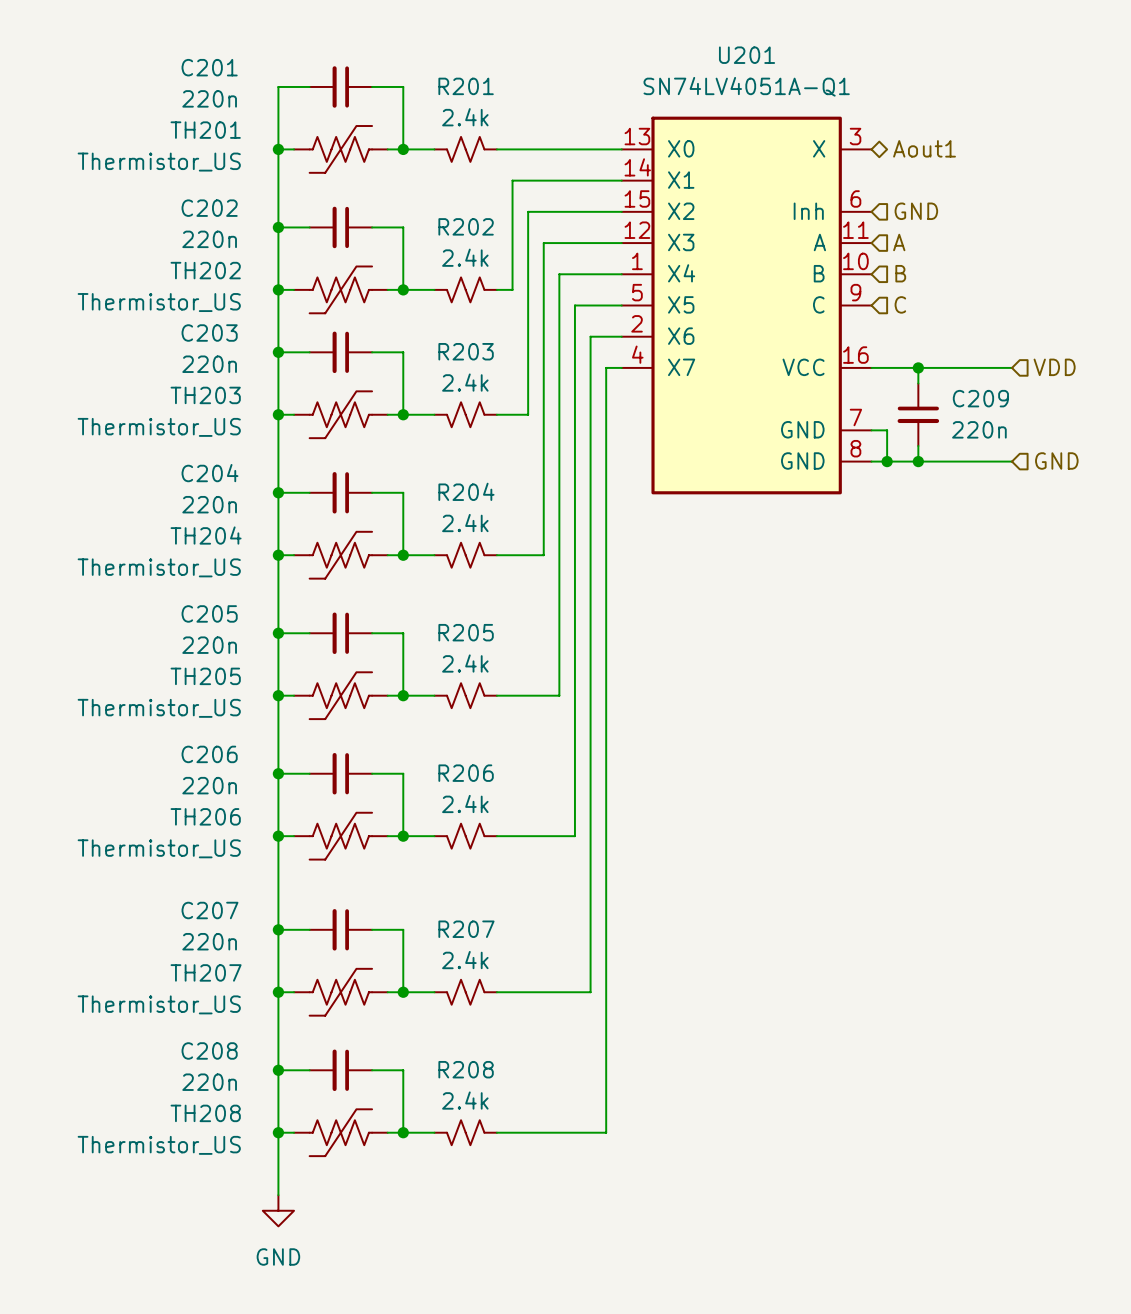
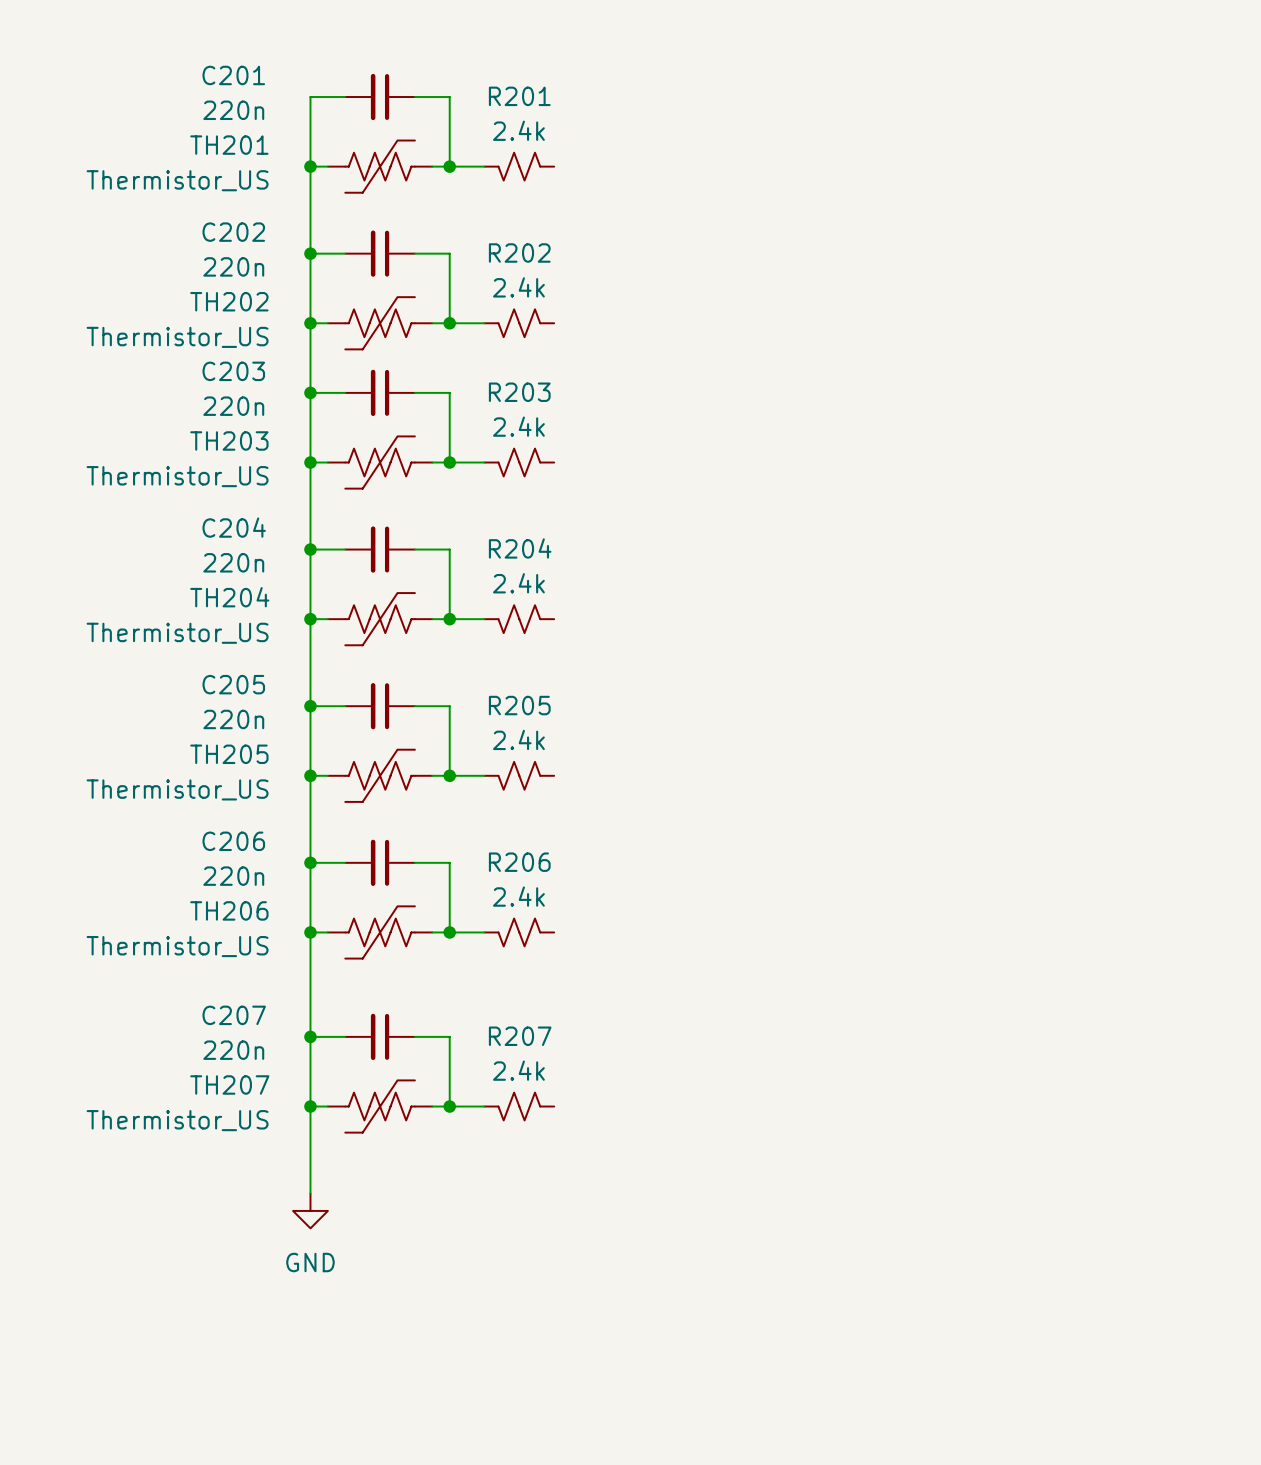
hierarchical label: Aout1 (924, 148) -> none
wire: (496, 149) (621, 149) -> none
wire: (621, 180) (512, 180) (512, 289) (496, 289) -> none
wire: (621, 211) (528, 211) (528, 414) (496, 414) -> none
hierarchical label: GND (916, 211) -> none
hierarchical label: A (899, 242) -> none
wire: (621, 243) (543, 243) (543, 555) (496, 555) -> none
hierarchical label: B (900, 273) -> none
wire: (621, 274) (559, 274) (559, 695) (496, 695) -> none
hierarchical label: C (900, 304) -> none
wire: (621, 305) (574, 305) (574, 836) (496, 836) -> none
U201: SN74LV4051A-Q1 (746, 305) -> none
wire: (621, 336) (590, 336) (590, 992) (496, 992) -> none
wire: (621, 367) (606, 367) (606, 1132) (496, 1132) -> none
wire: (871, 367) (1011, 367) -> none
wire: (918, 367) (918, 383) -> none
junction: (918, 367) -> none
hierarchical label: VDD (1054, 367) -> none
C209: 220n (918, 414) -> none
wire: (871, 430) (887, 430) (887, 461) -> none
wire: (918, 445) (918, 461) -> none
hierarchical label: GND (1056, 460) -> none
wire: (871, 461) (1011, 461) -> none
junction: (887, 461) -> none
junction: (918, 461) -> none
junction: (278, 1070) -> none
wire: (309, 1070) (278, 1070) (278, 1195) -> none
C208: 220n (340, 1070) -> none
wire: (372, 1070) (403, 1070) (403, 1132) -> none
wire: (278, 1132) (294, 1132) -> none
junction: (278, 1132) -> none
TH208: Thermistor_US (340, 1132) -> none
wire: (387, 1132) (434, 1132) -> none
junction: (403, 1132) -> none
R208: 2.4k (465, 1132) -> none
power symbol position: GND (278, 1210) -> GND (310, 1210)

